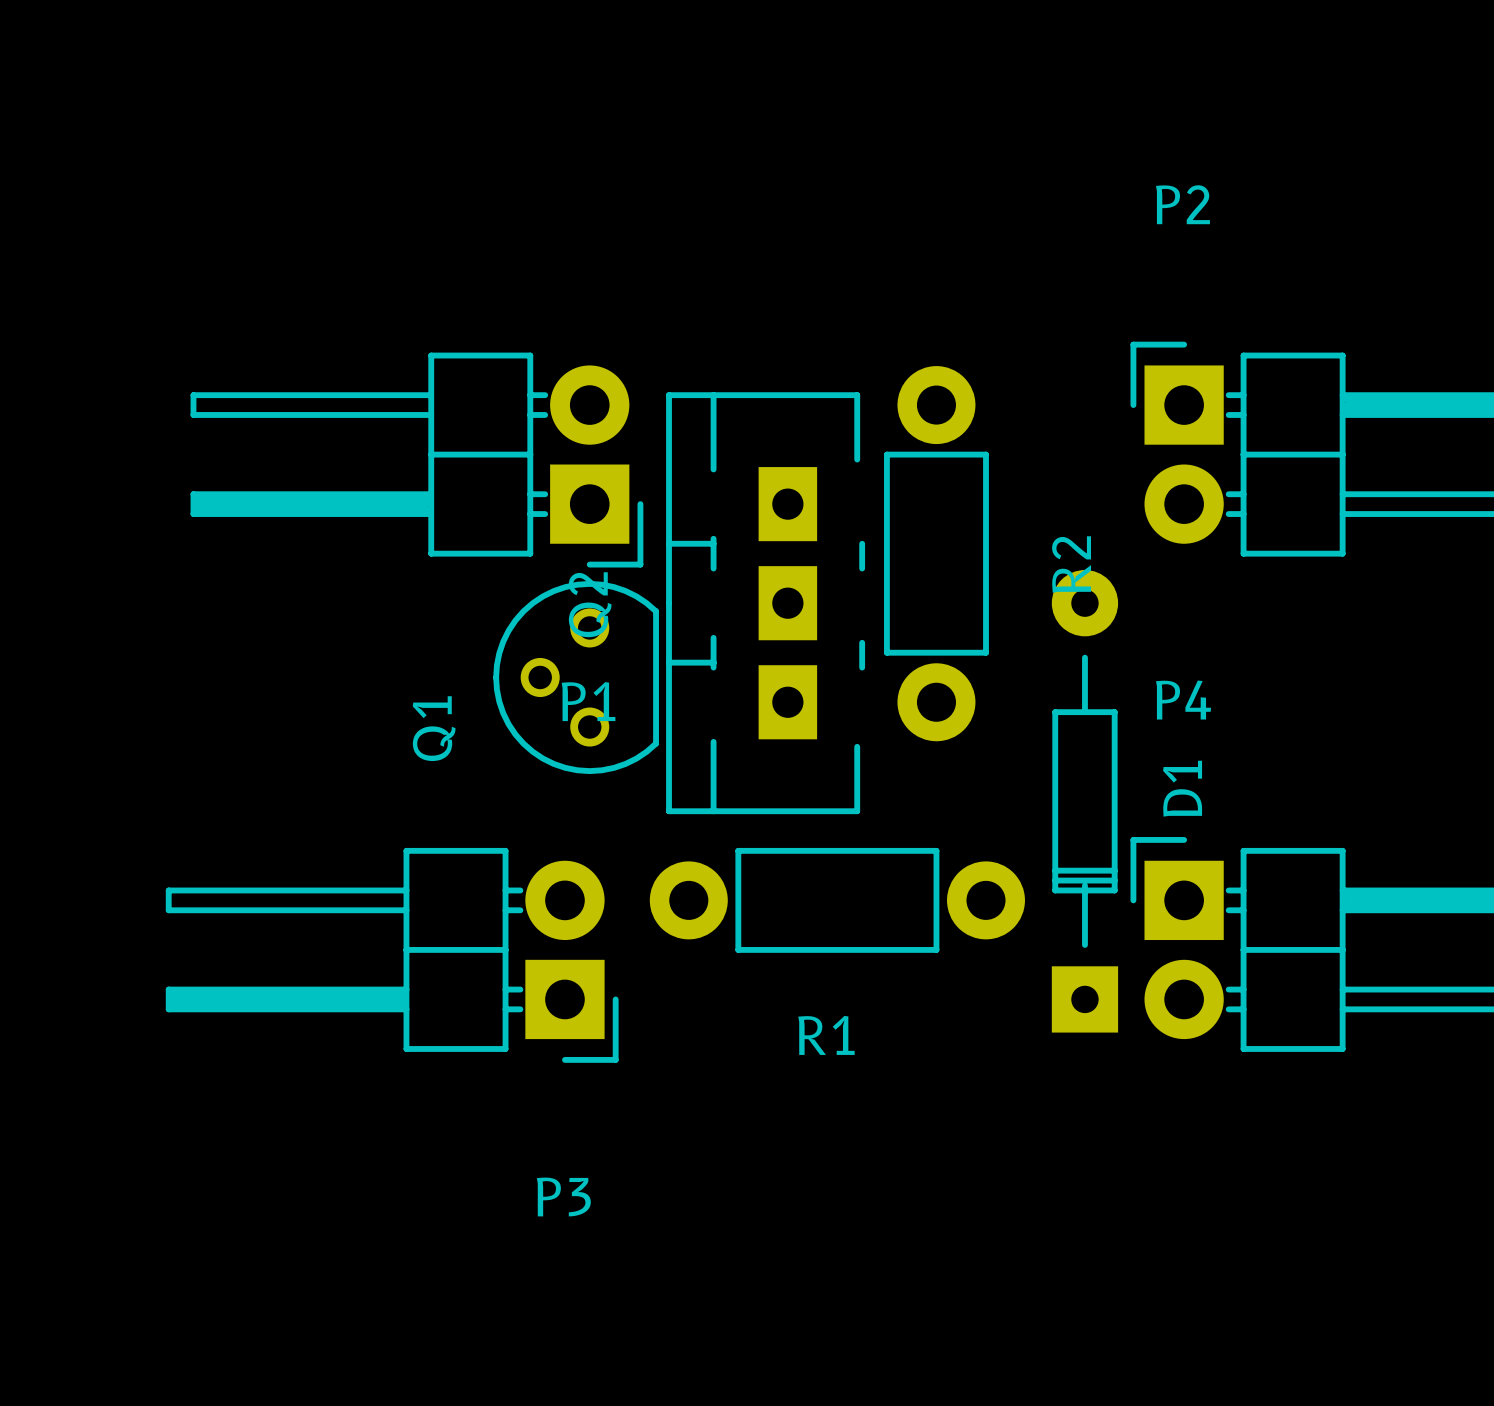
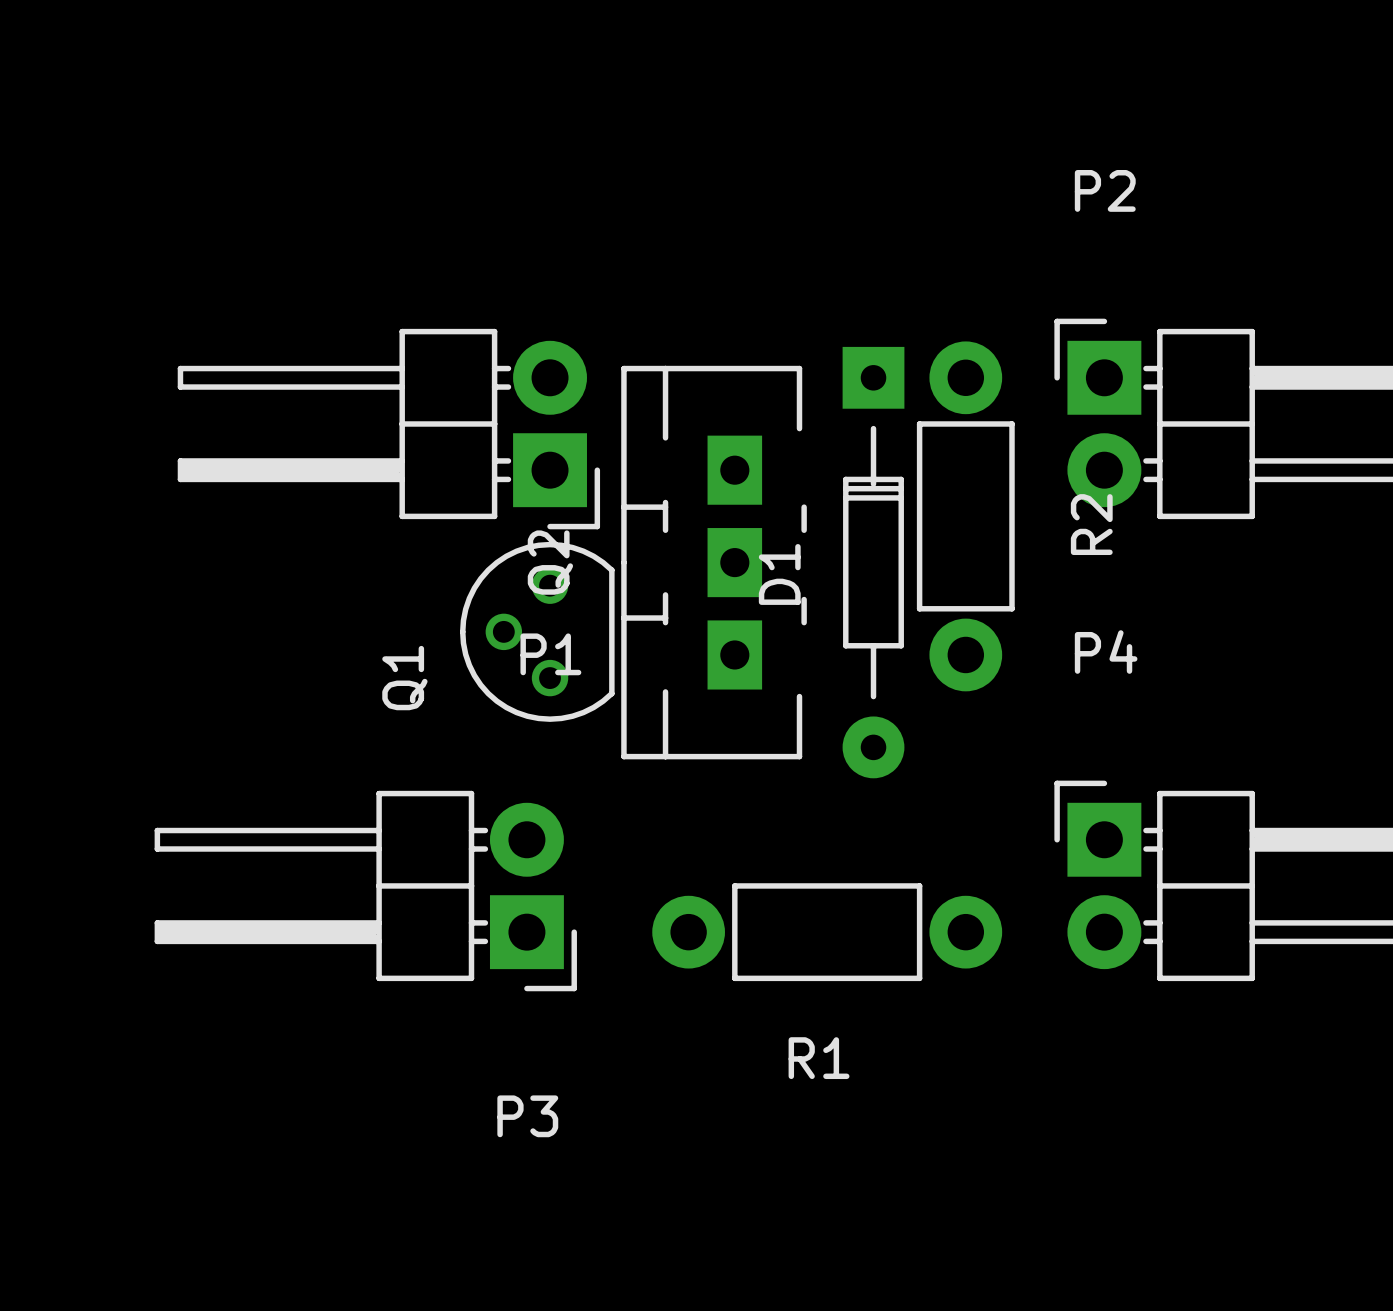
R2 position: (936, 553) -> (965, 516)
D1 rotation: 0° (1084, 801) -> 180° (873, 562)
R1 position: (837, 900) -> (827, 932)

